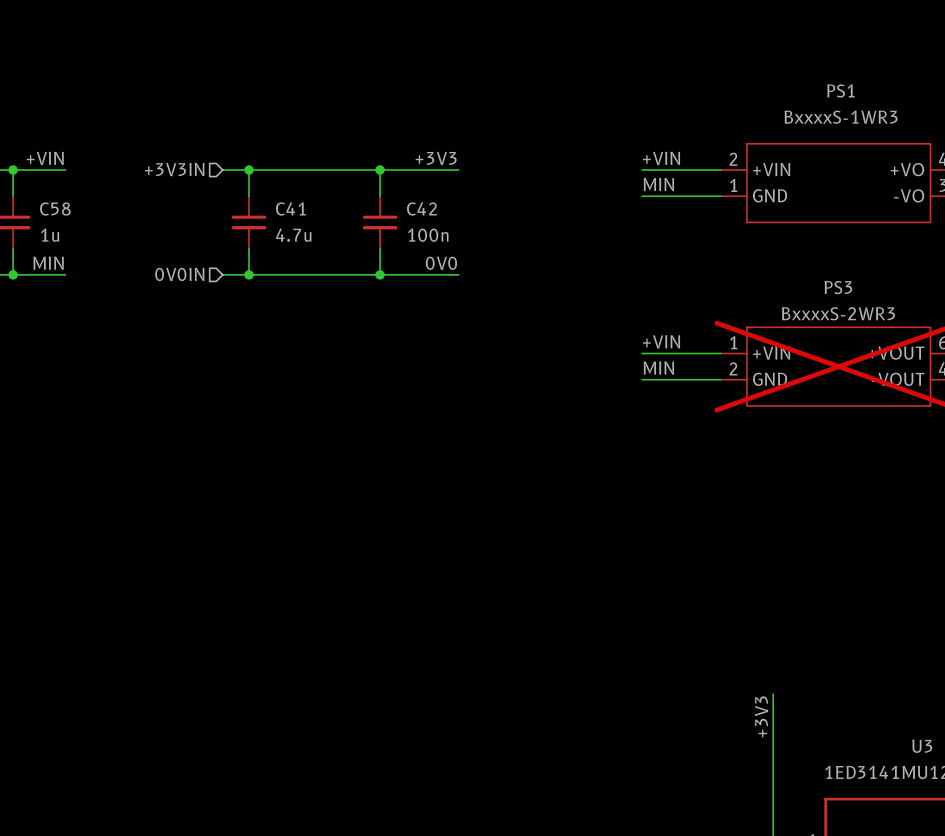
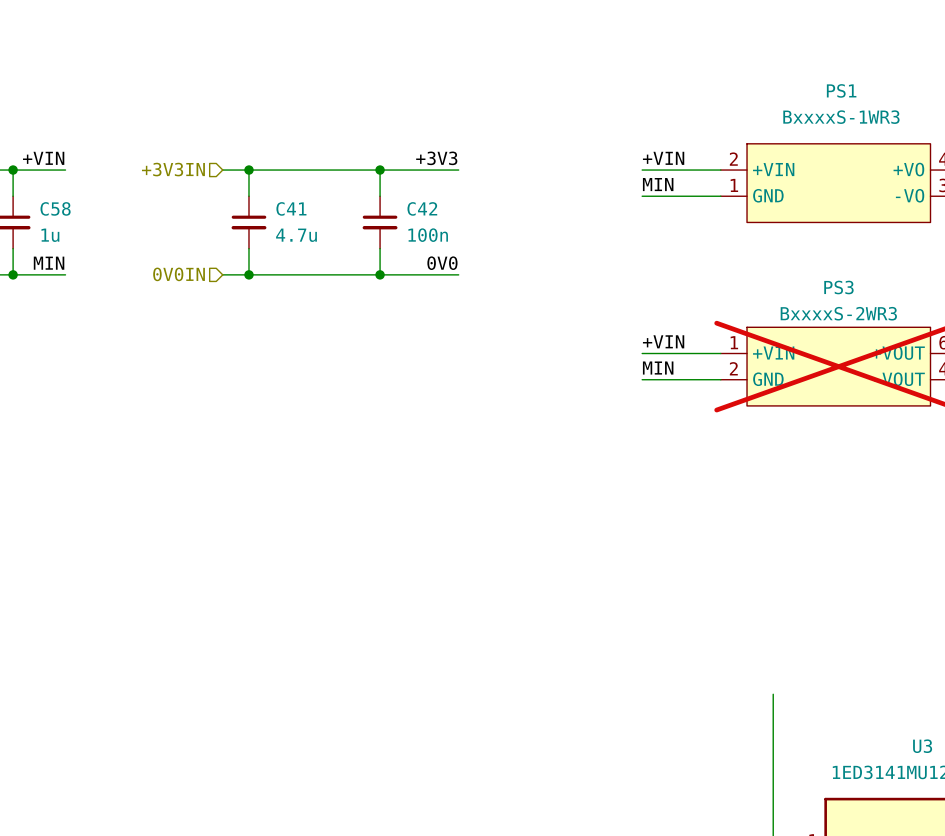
label: +3V3 (761, 716) -> none

